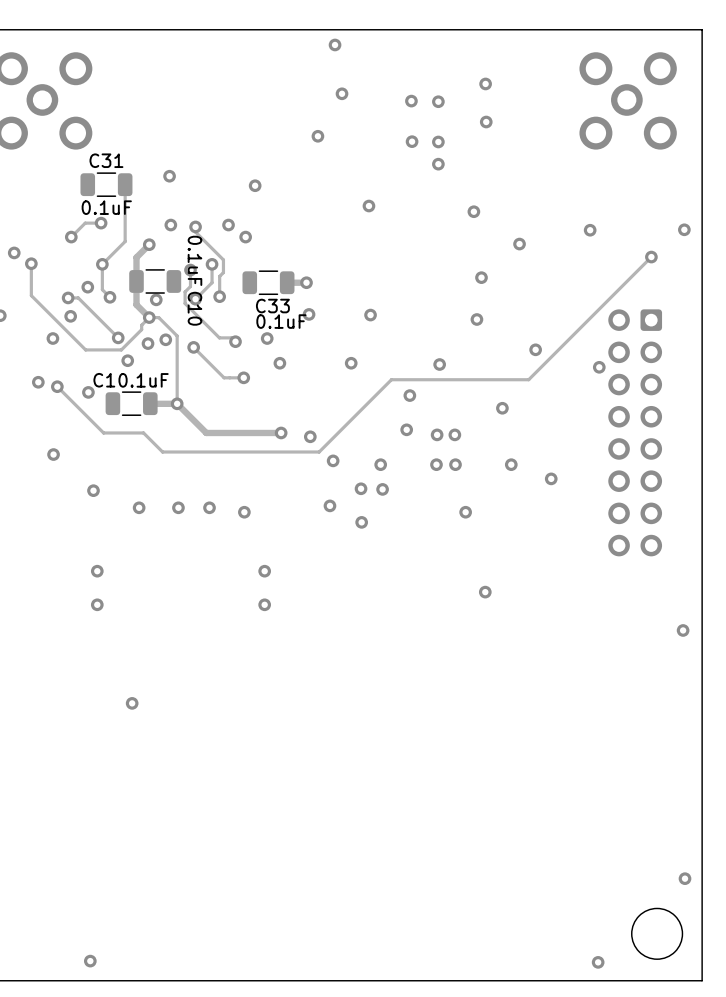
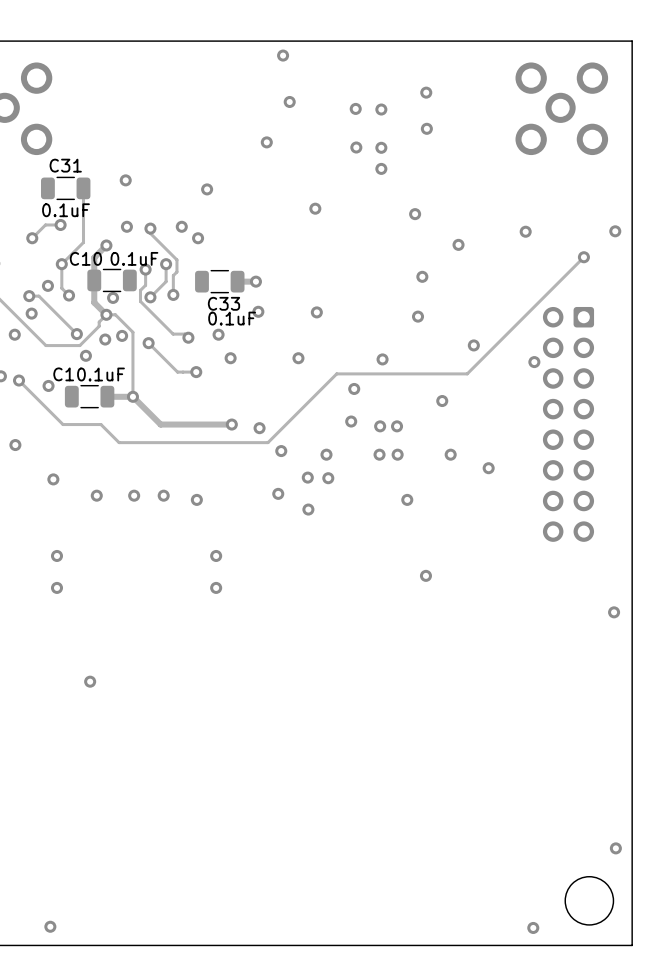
C10 value rotation: 0° (194, 260) -> 90° counterclockwise (134, 258)
C10 name rotation: 0° (194, 308) -> 90° counterclockwise (85, 258)
C10 name position: C10 (194, 308) -> C10 (85, 258)

